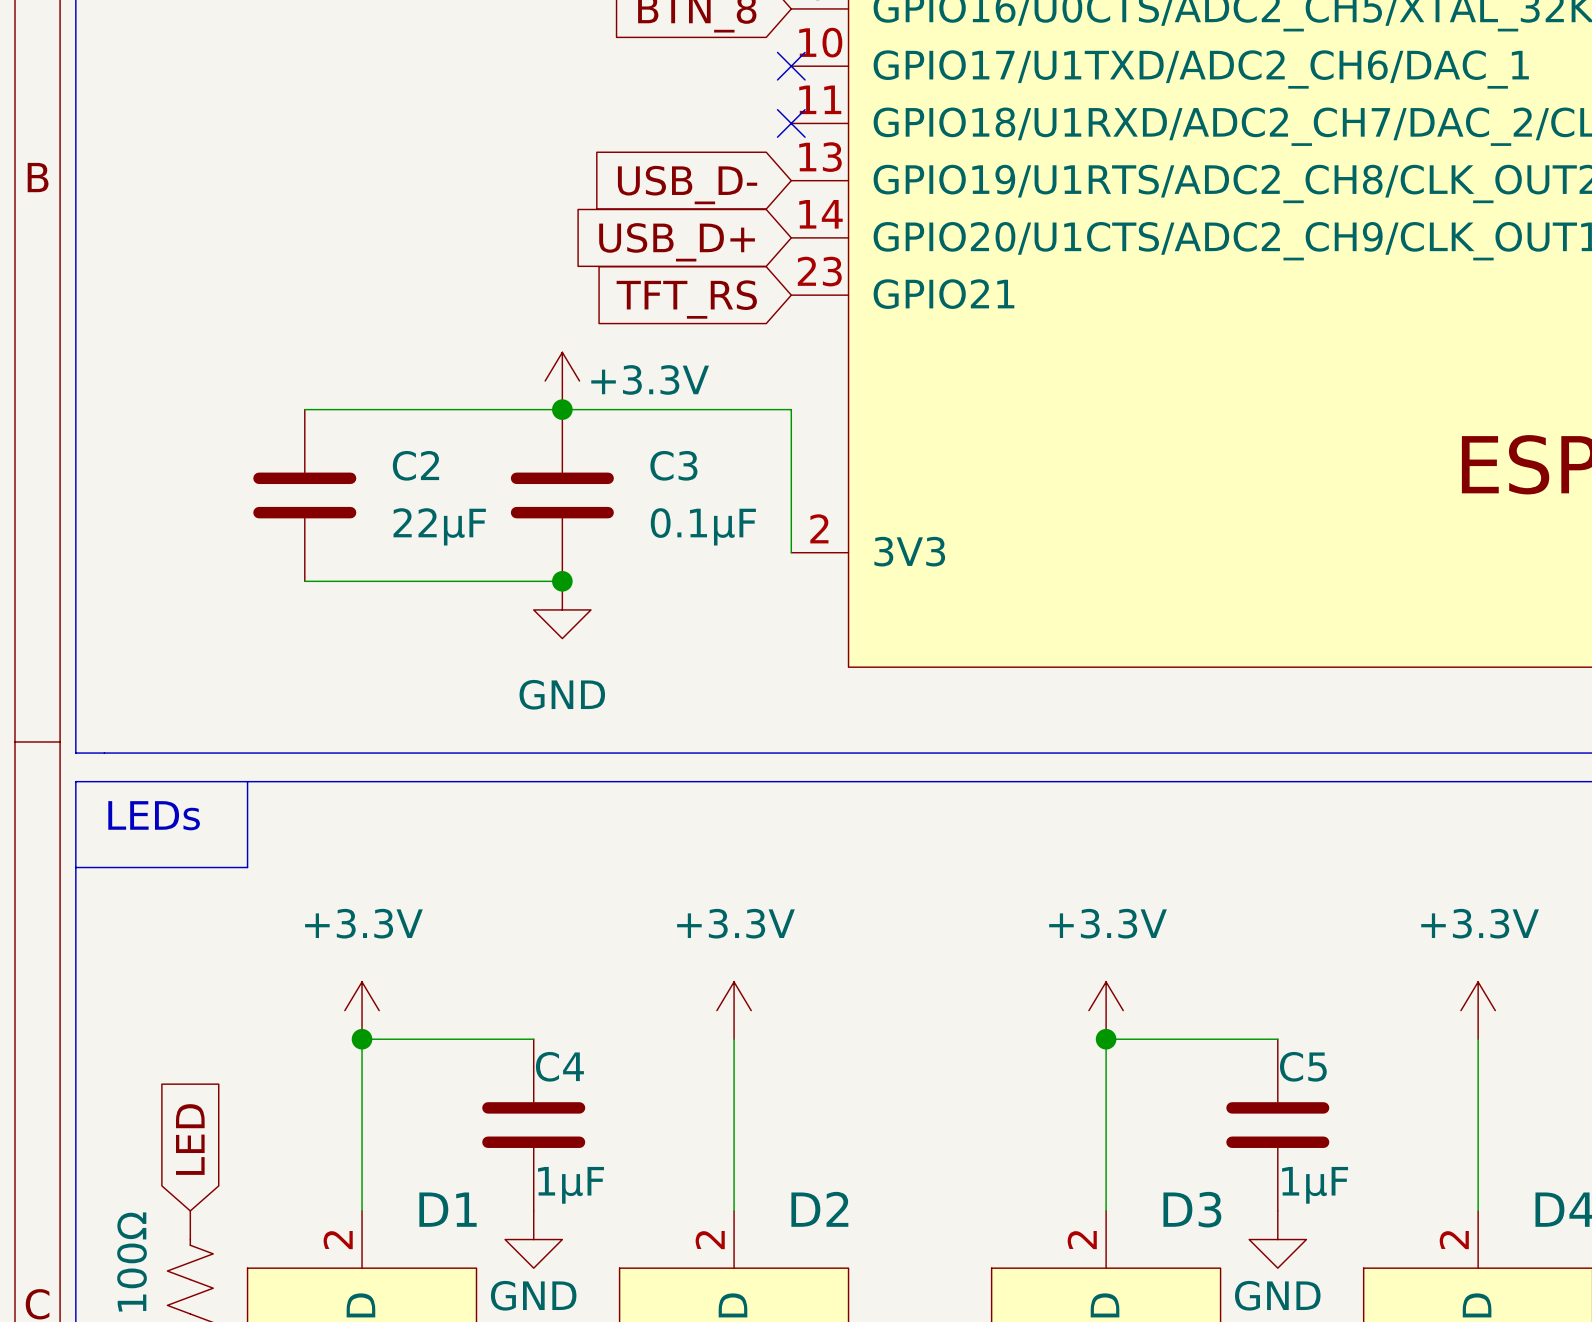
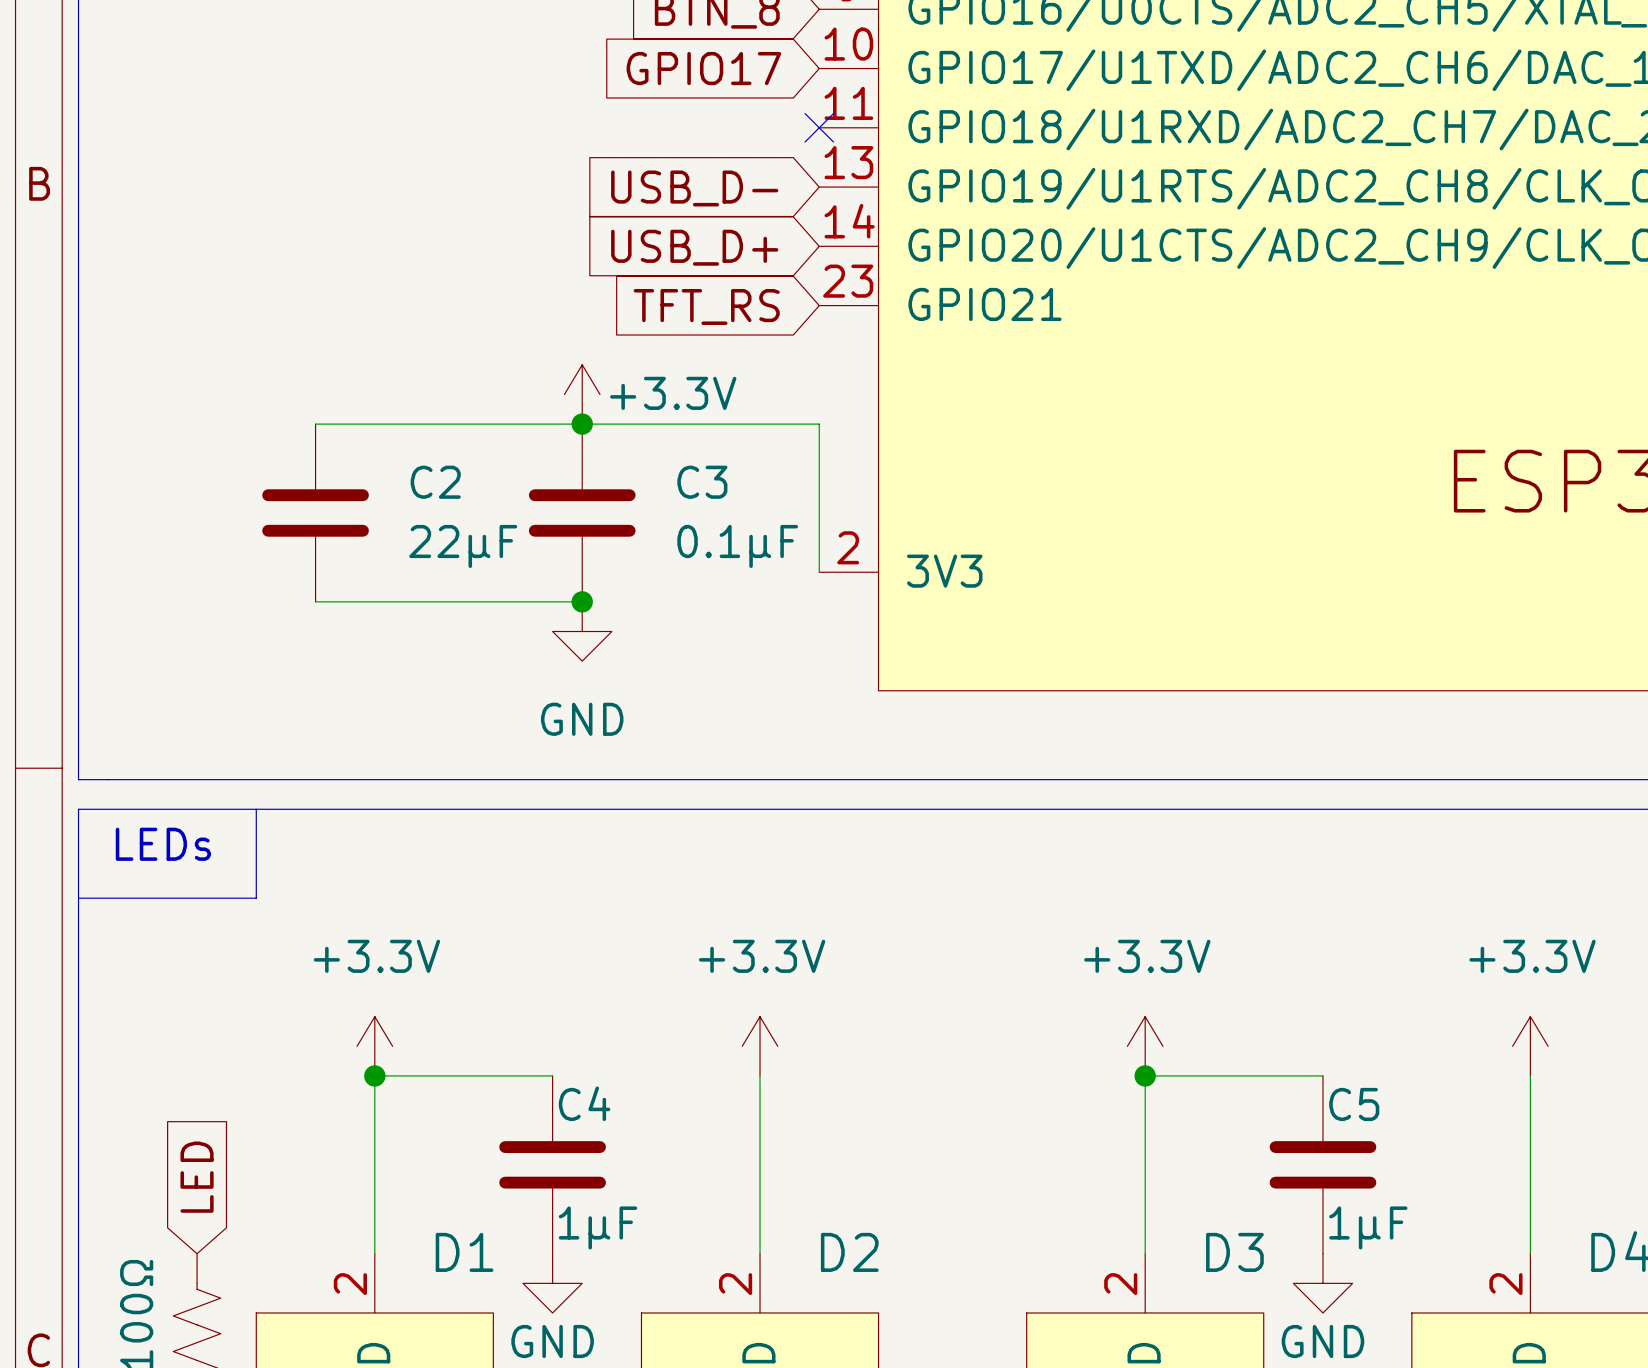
global label: none -> GPIO17 (703, 68)
no-connect mark: (791, 66) -> none

